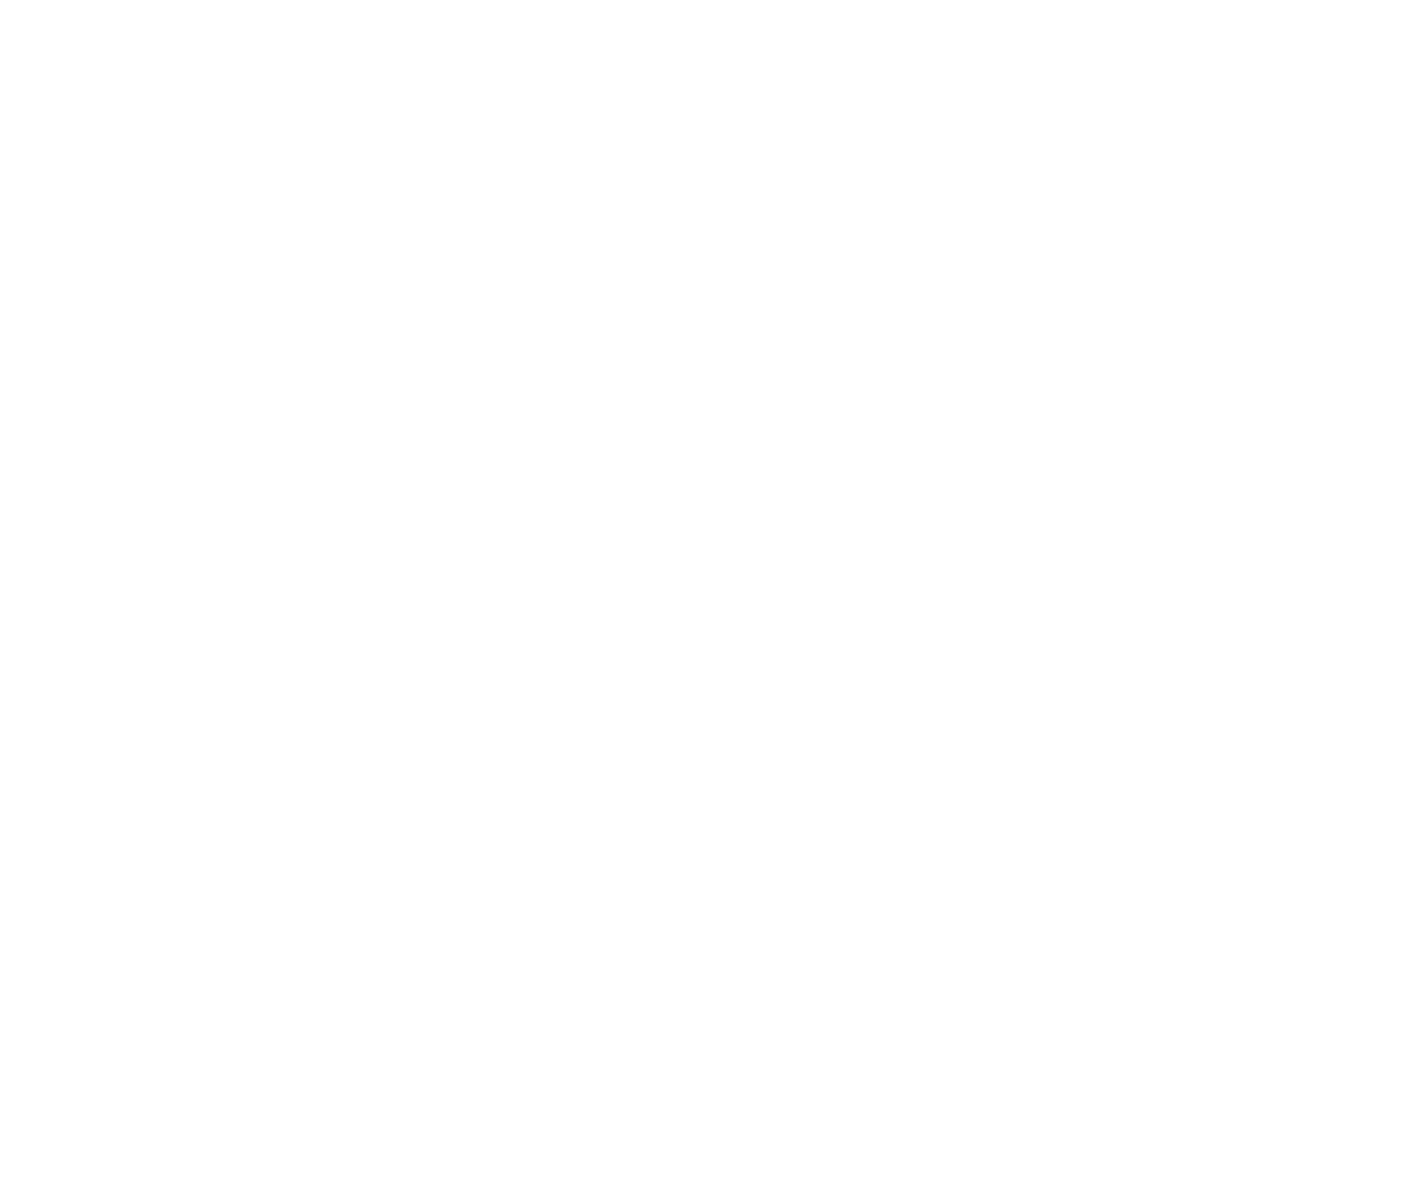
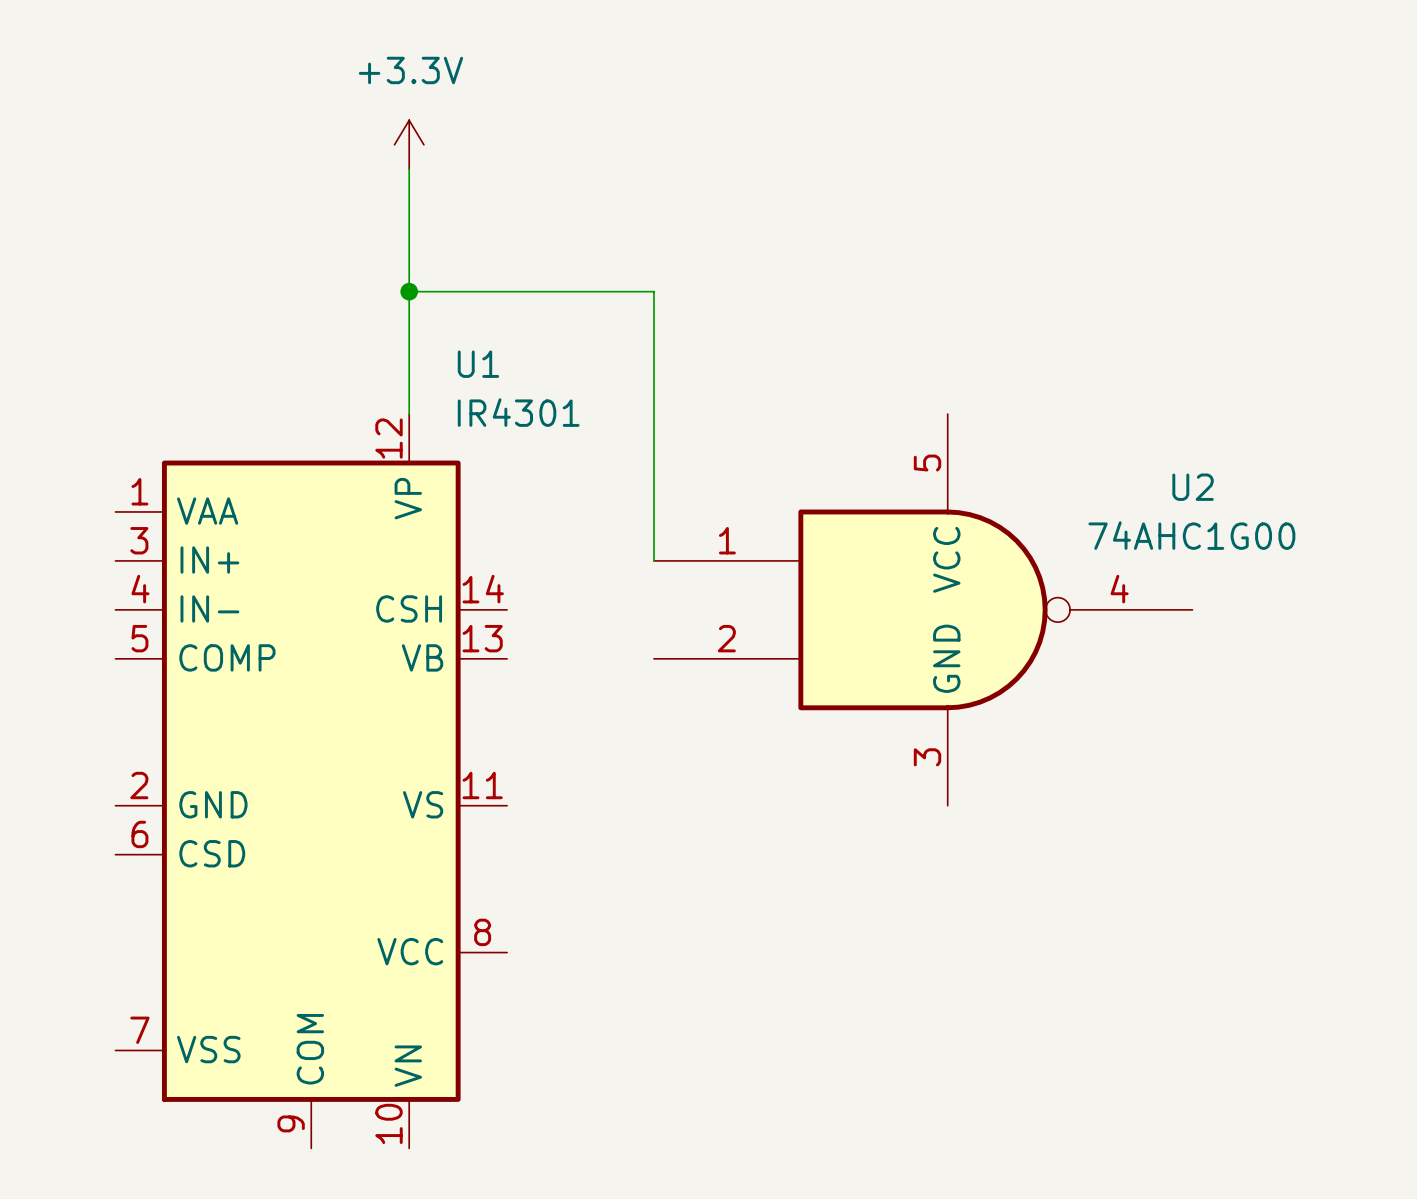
power symbol: none -> +3.3V (409, 144)
wire: none -> (409, 169) (409, 414)
wire: none -> (409, 291) (653, 291) (653, 560)
junction: none -> (409, 291)
U2: none -> 74AHC1G00 (923, 609)
U1: none -> IR4301 (311, 781)

